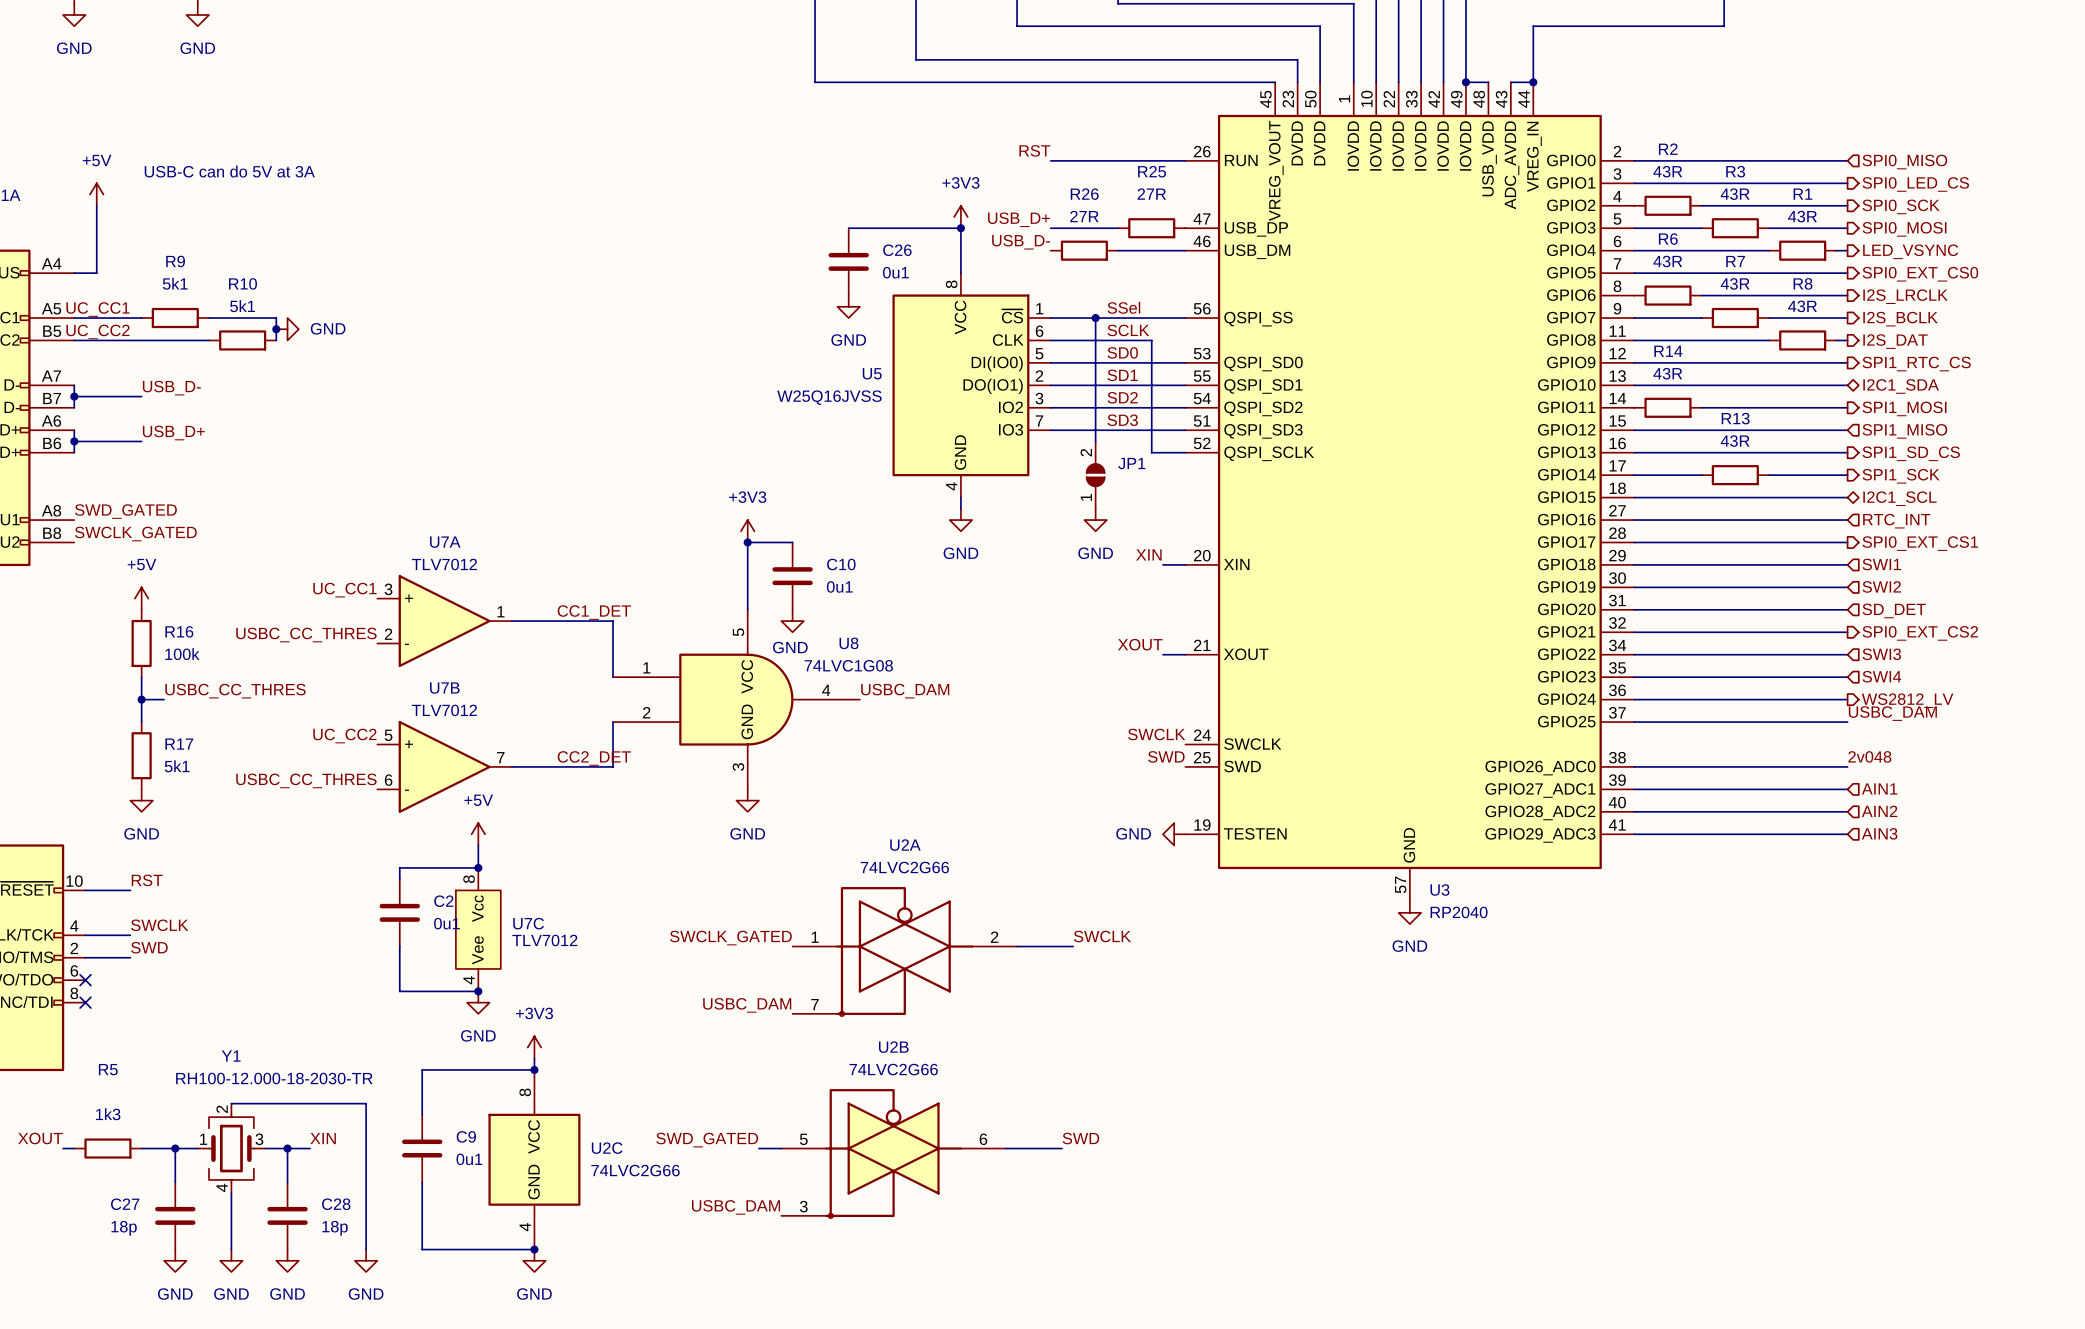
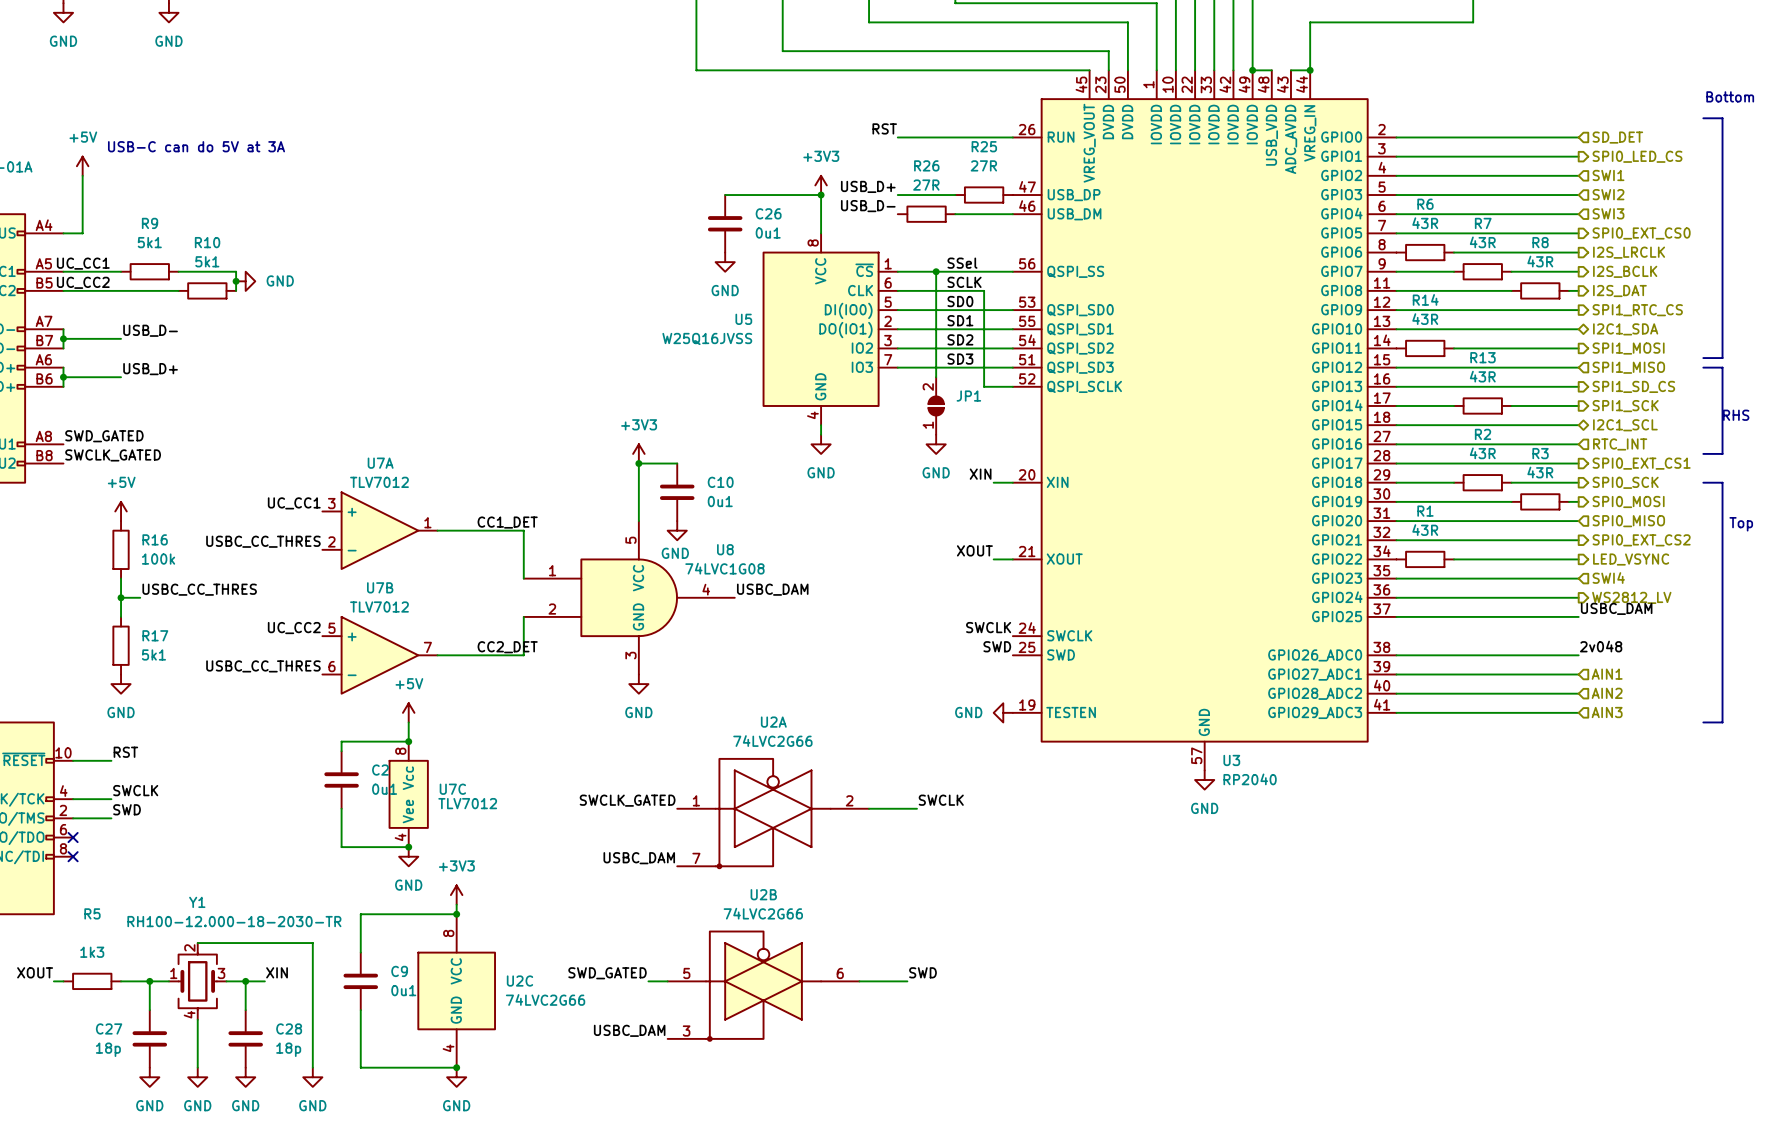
text: none -> Bottom (1730, 96)
line: none -> (1703, 118) (1722, 118) (1722, 358) (1703, 358)
hierarchical label: SPI0_MISO (1904, 162) -> SD_DET (1617, 137)
wire: none -> (1396, 175) (1454, 175)
R2 position: (1668, 205) -> (1482, 482)
hierarchical label shape: output (1901, 206) -> input (1608, 175)
hierarchical label: SPI0_SCK (1901, 206) -> SWI1 (1608, 175)
wire: none -> (1454, 195) (1511, 195)
R3 position: (1735, 228) -> (1540, 501)
hierarchical label shape: output (1904, 229) -> input (1608, 194)
hierarchical label: SPI0_MOSI (1904, 229) -> SWI2 (1608, 194)
wire: none -> (1511, 214) (1569, 214)
R1 position: (1802, 250) -> (1425, 559)
hierarchical label shape: output (1910, 251) -> input (1608, 213)
hierarchical label: LED_VSYNC (1910, 251) -> SWI3 (1608, 213)
line: none -> (1703, 367) (1722, 367) (1722, 453) (1703, 453)
text: none -> RHS (1736, 415)
wire: (1701, 564) (1769, 564) -> none
hierarchical label shape: input (1881, 564) -> output (1625, 482)
hierarchical label: SWI1 (1881, 564) -> SPI0_SCK (1625, 482)
line: none -> (1703, 482) (1722, 482) (1722, 722) (1703, 722)
hierarchical label shape: input (1881, 586) -> output (1628, 501)
hierarchical label: SWI2 (1881, 586) -> SPI0_MOSI (1628, 501)
wire: (1769, 587) (1836, 587) -> none
hierarchical label: SD_DET (1894, 610) -> SPI0_MISO (1628, 521)
text: none -> Top (1741, 524)
wire: (1634, 654) (1701, 654) -> none
hierarchical label shape: input (1881, 654) -> output (1631, 559)
hierarchical label: SWI3 (1881, 654) -> LED_VSYNC (1631, 559)

